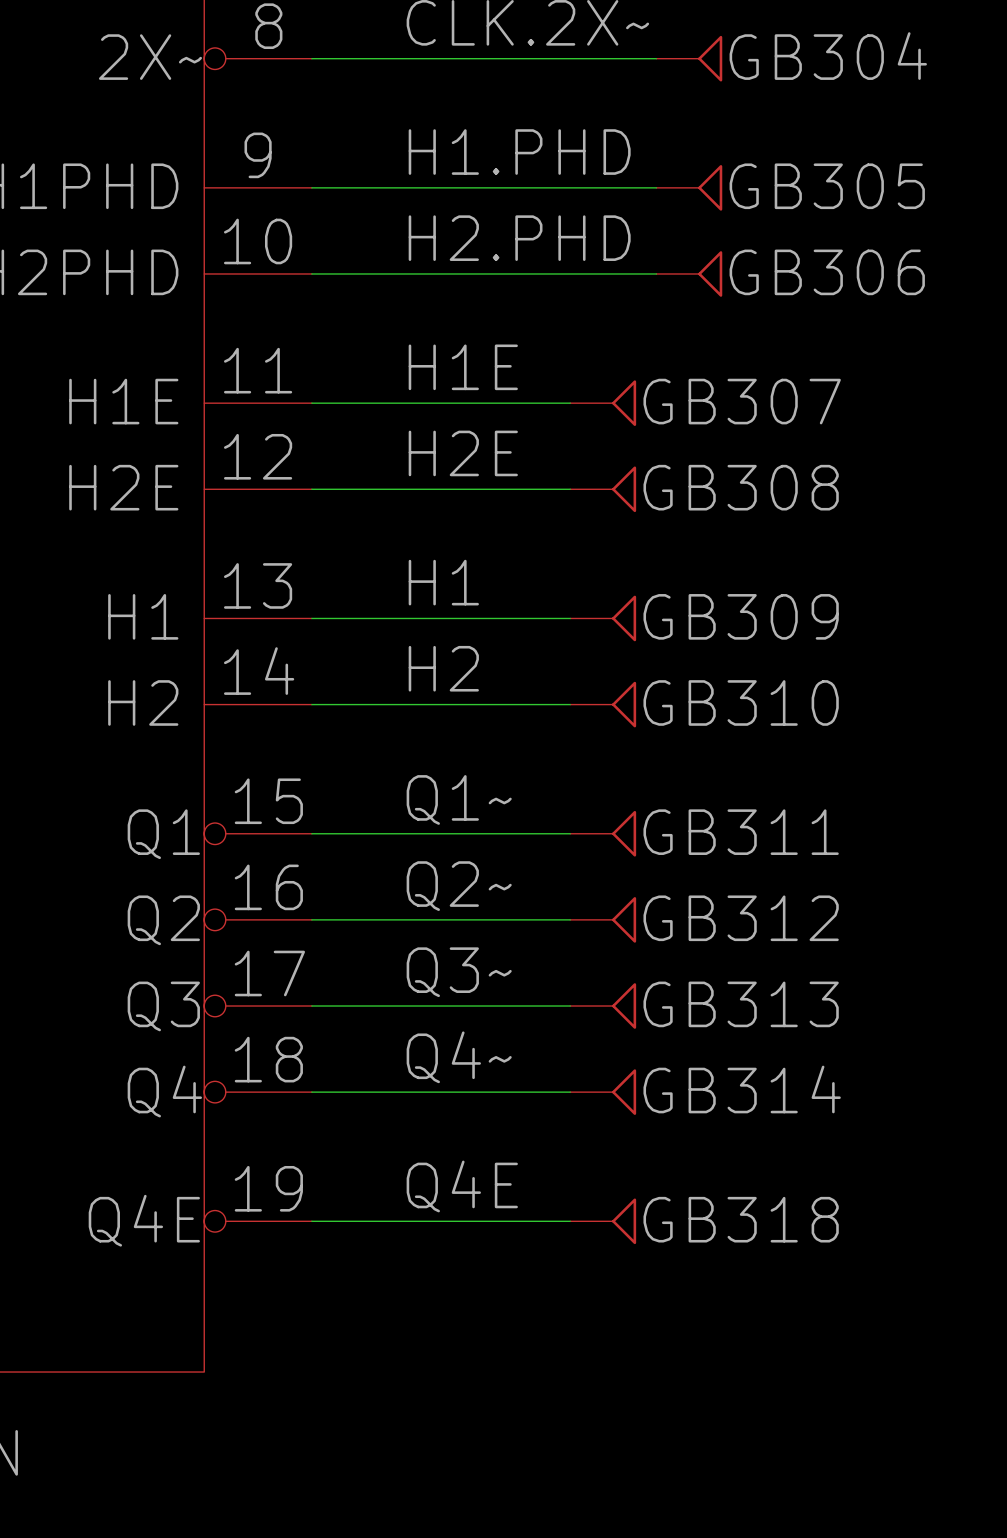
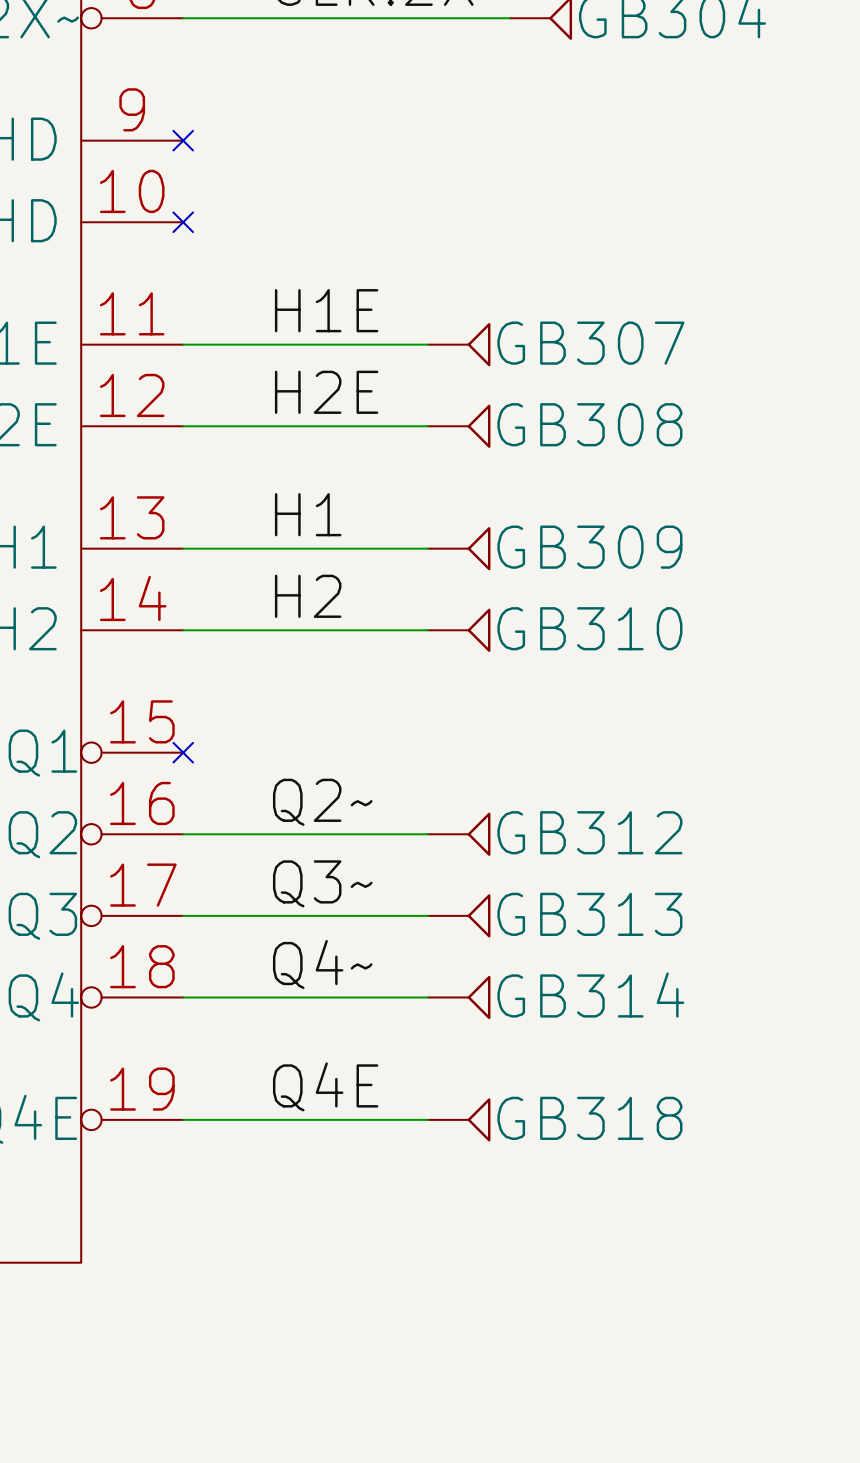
label: H1.PHD (519, 152) -> none
wire: (311, 187) (656, 187) -> none
no-connect mark: none -> (183, 140)
GB305: (689, 187) -> none
label: H2.PHD (519, 238) -> none
wire: (311, 273) (656, 273) -> none
no-connect mark: none -> (183, 222)
GB306: (689, 273) -> none
label: Q1~ (459, 799) -> none
wire: (311, 833) (570, 833) -> none
no-connect mark: none -> (183, 752)
GB311: (603, 833) -> none

